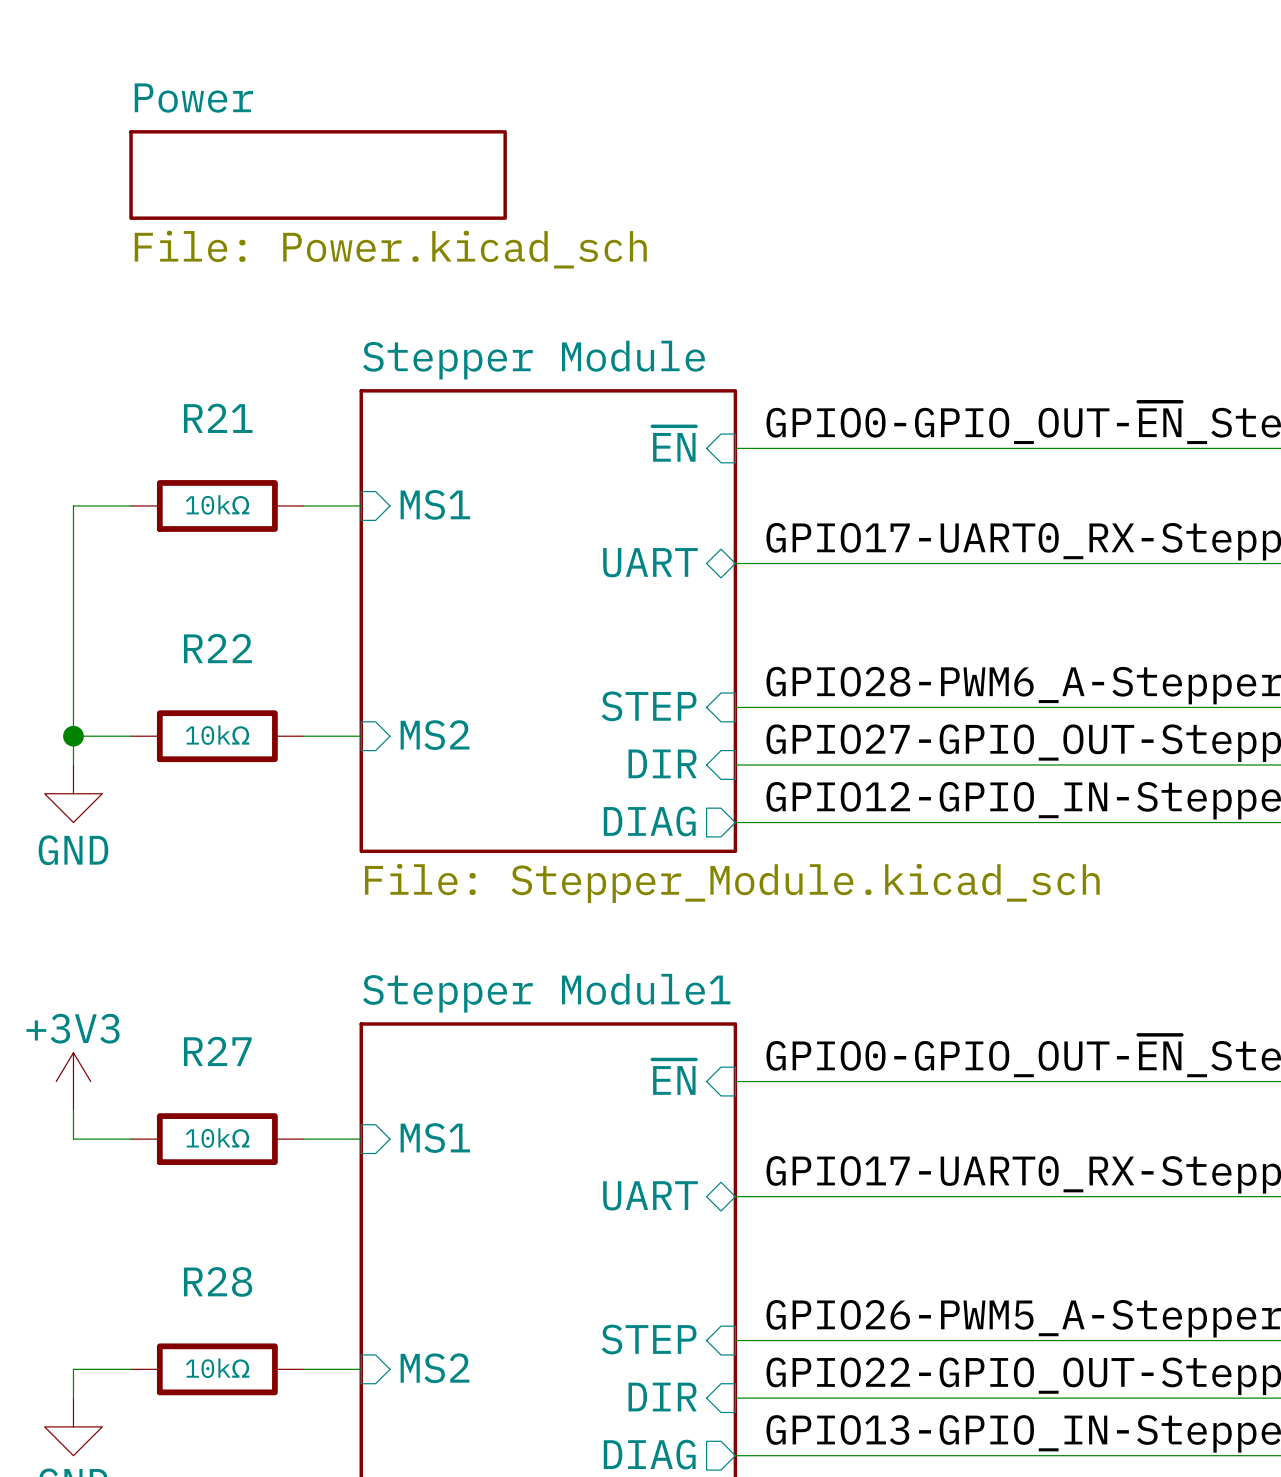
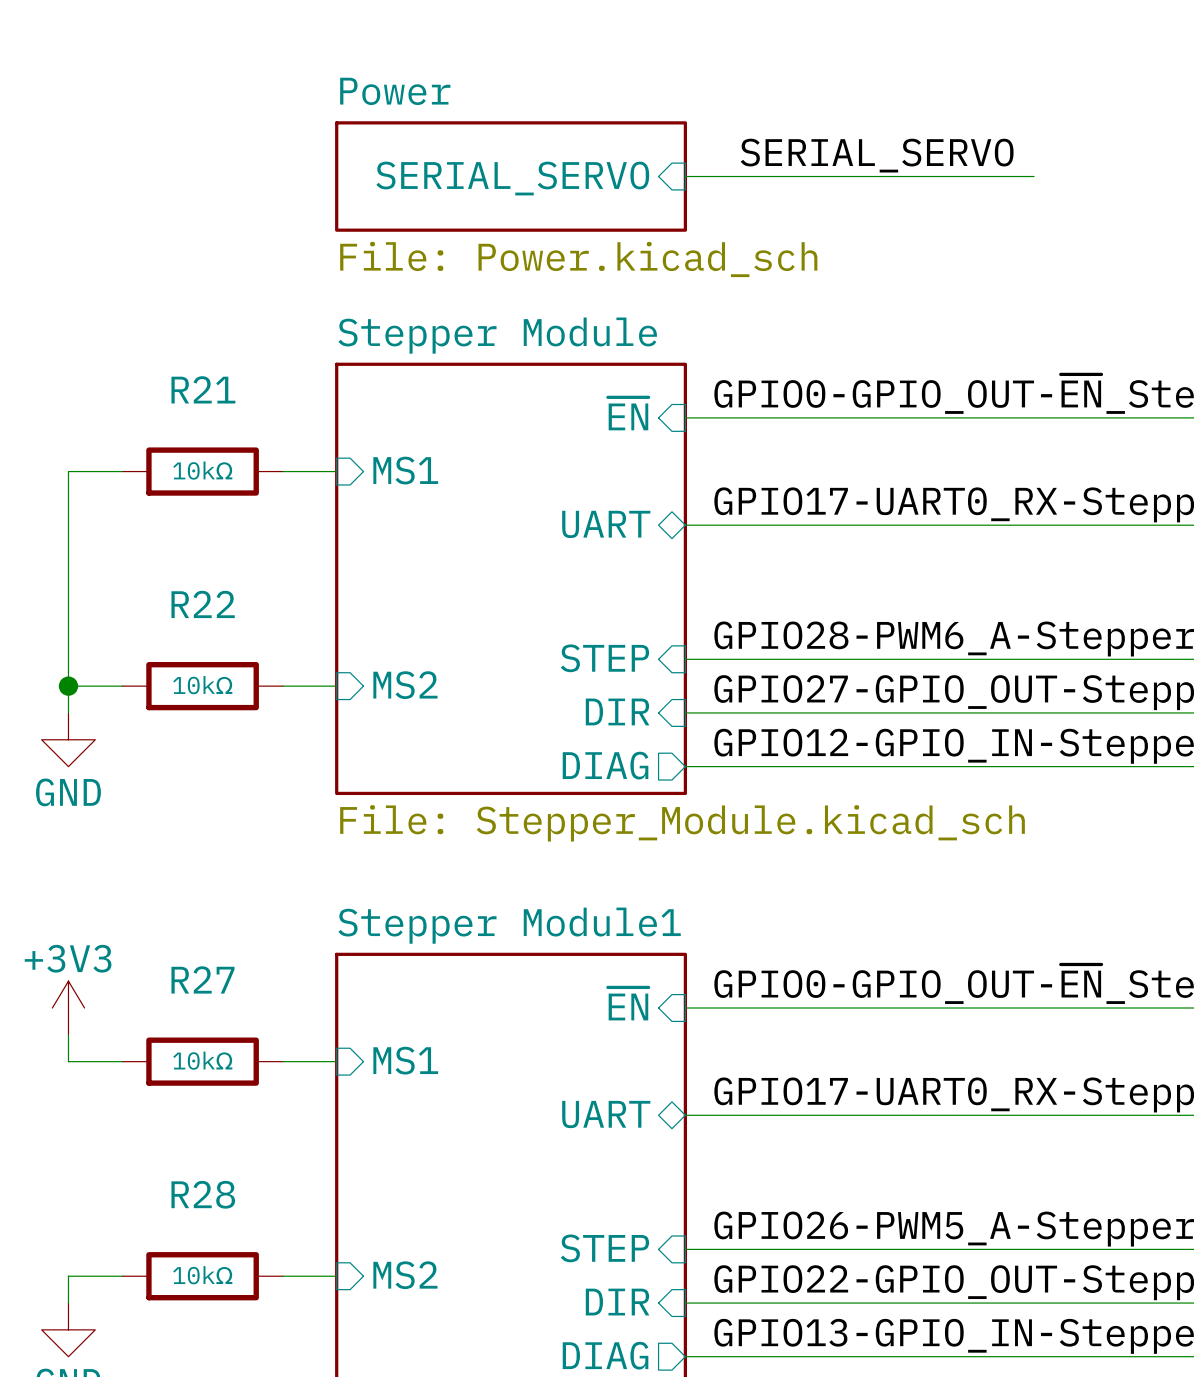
label: none -> SERIAL_SERVO (877, 155)
sheet Power: File: Power.kicad_sch (318, 175) -> none
sheet Power: none -> File: Power.kicad_sch (511, 176)
wire: none -> (685, 176) (1034, 176)
sheet pin: none -> SERIAL_SERVO (512, 178)

